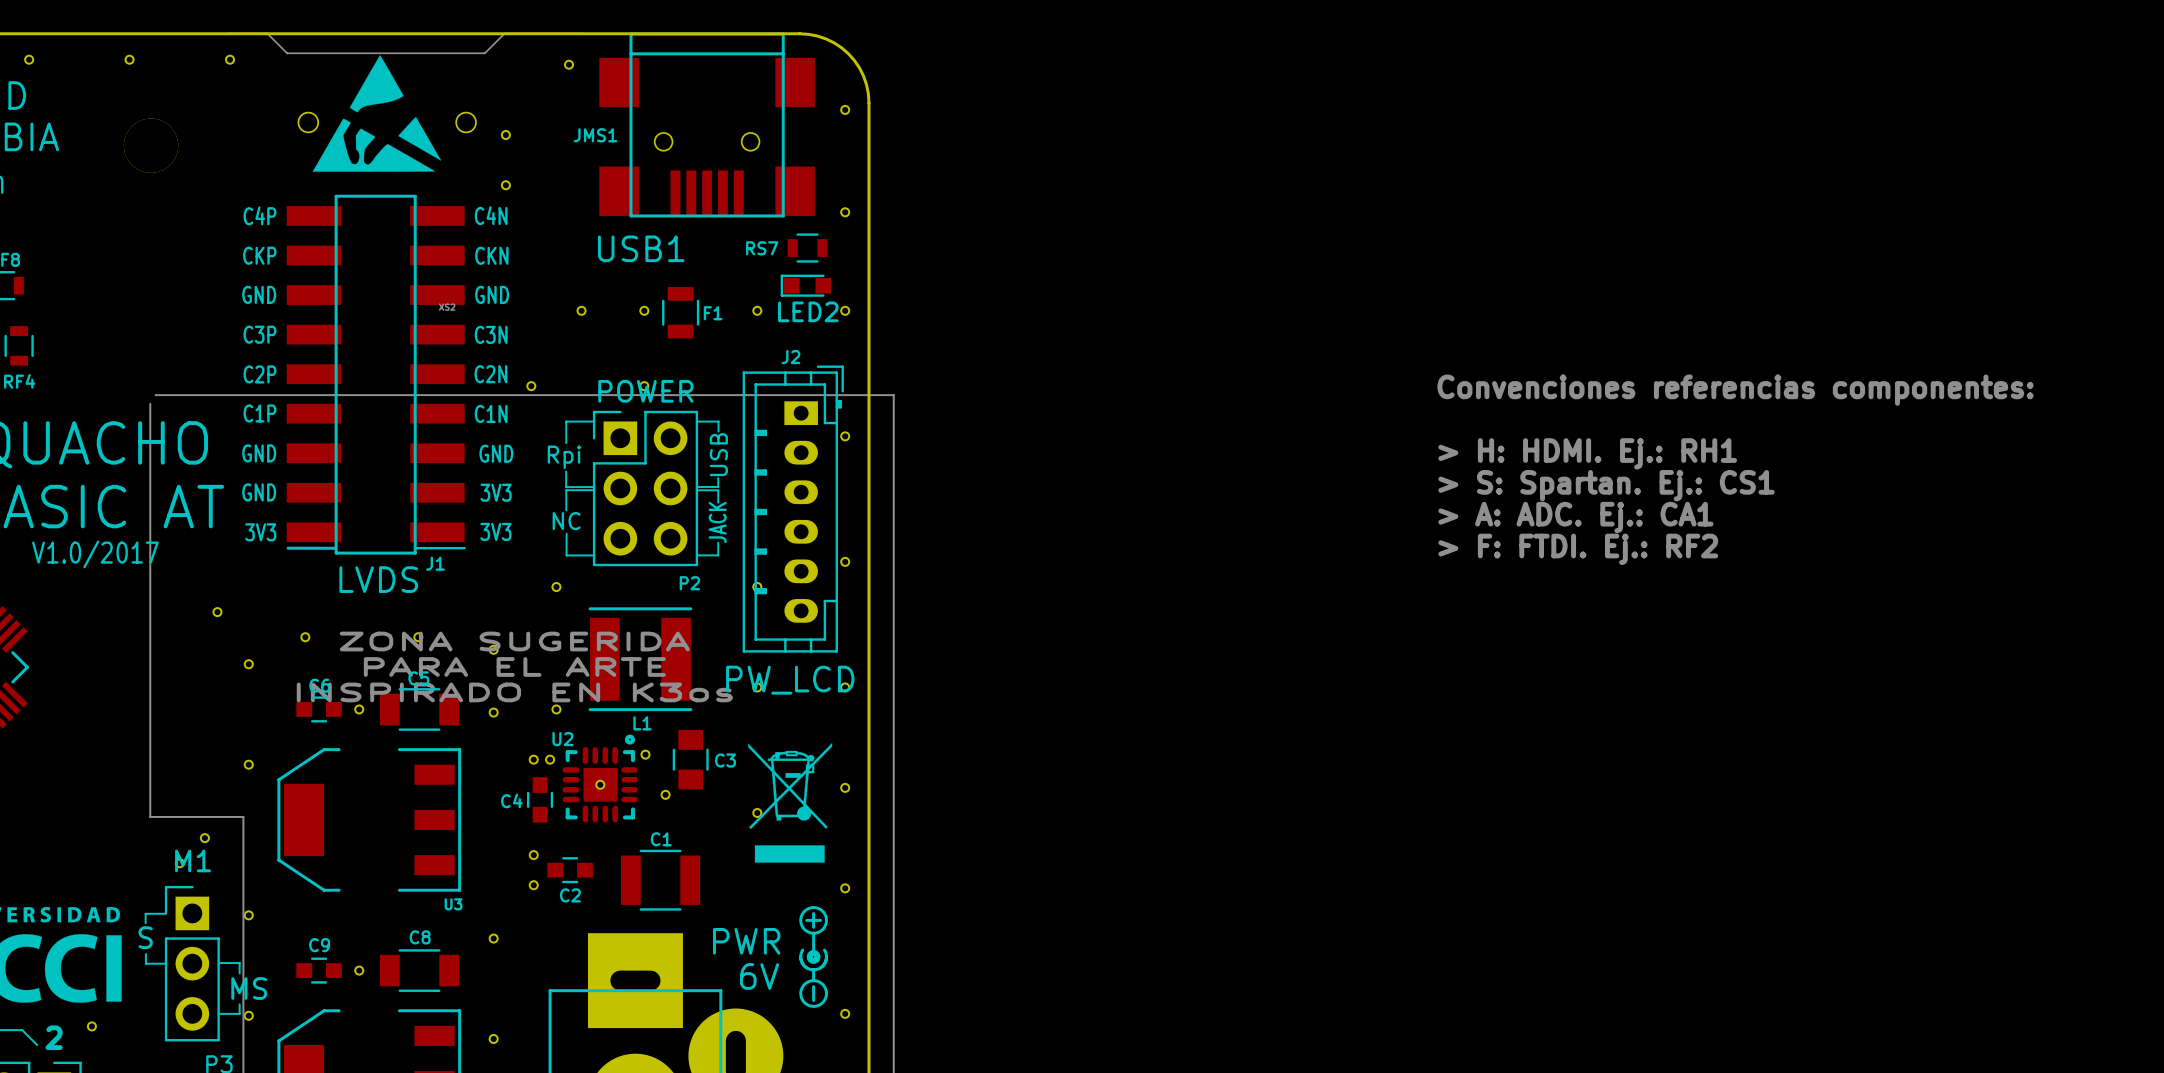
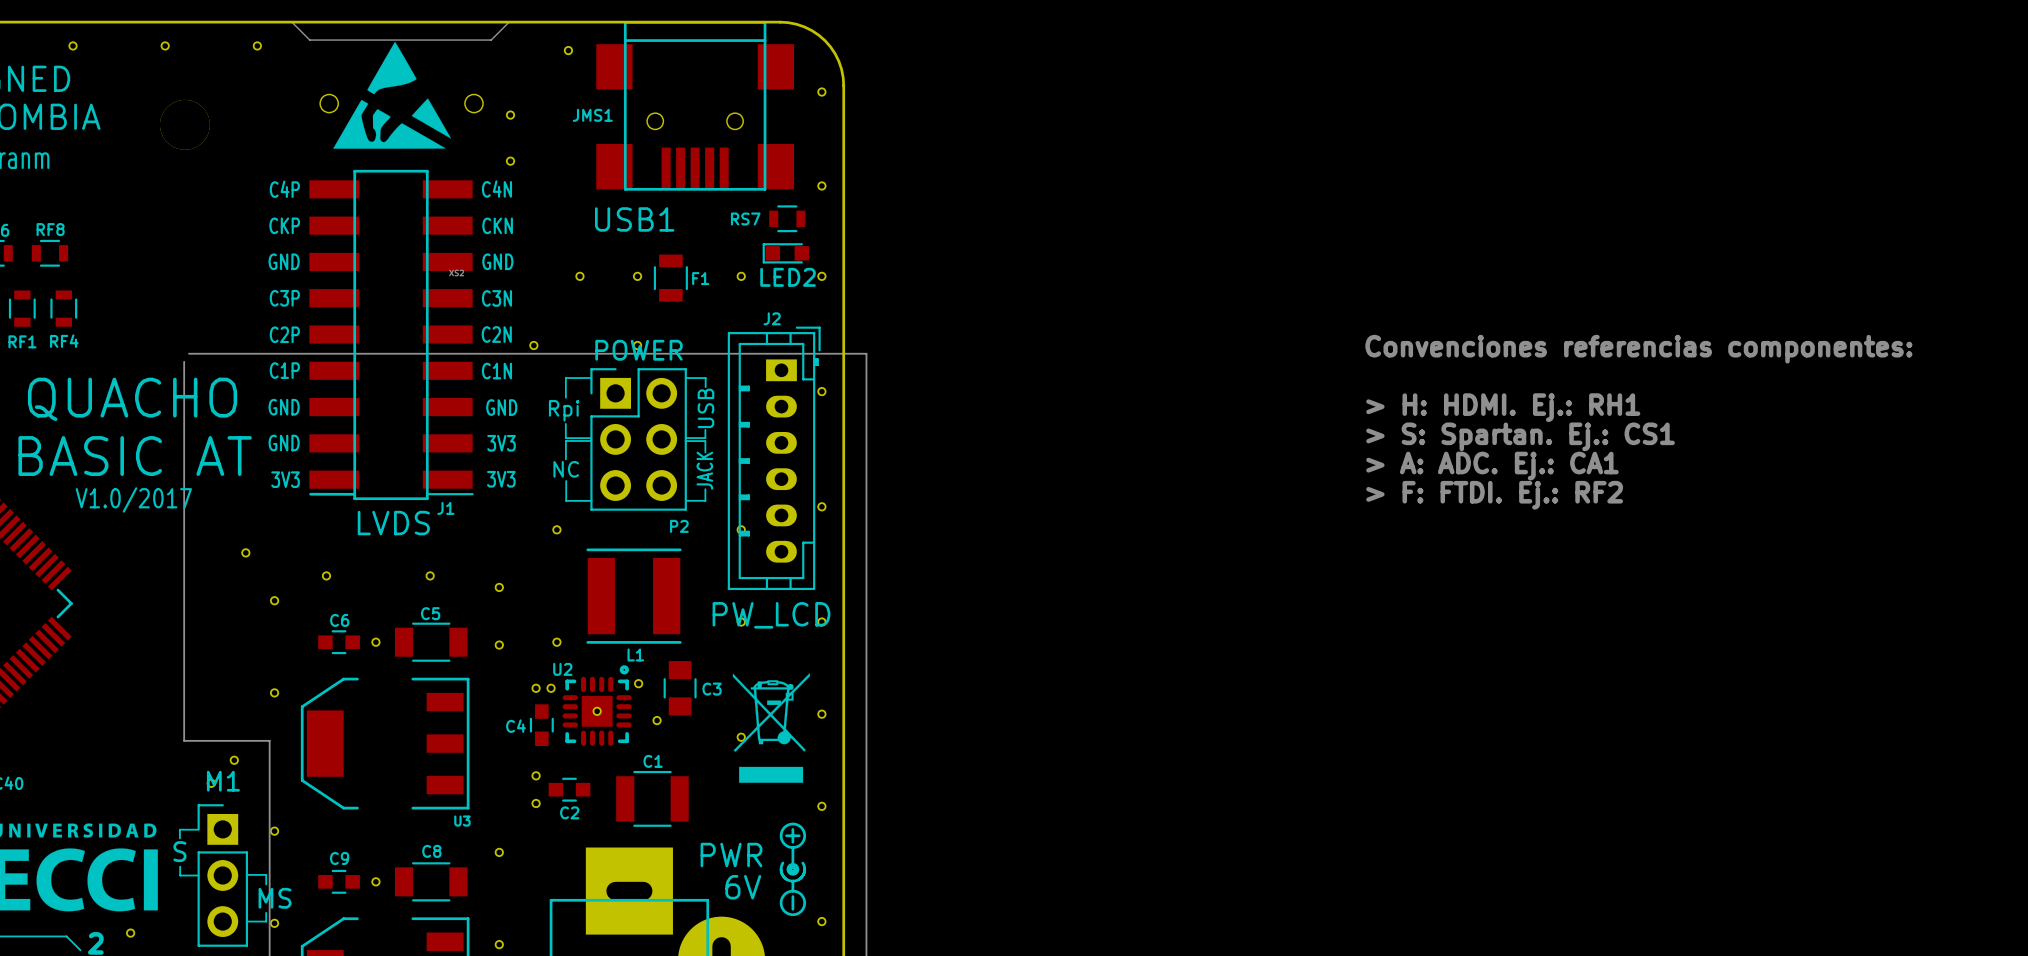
text: ZONA SUGERIDA (514, 641) -> none
text: PARA EL ARTE (514, 666) -> none
text: INSPIRADO EN K3os (514, 692) -> none

